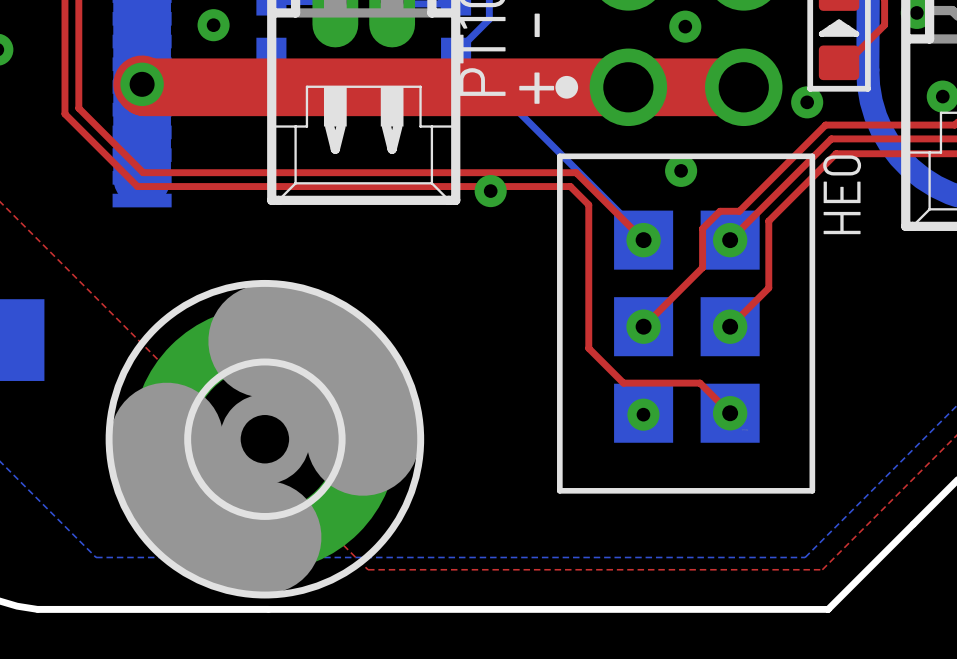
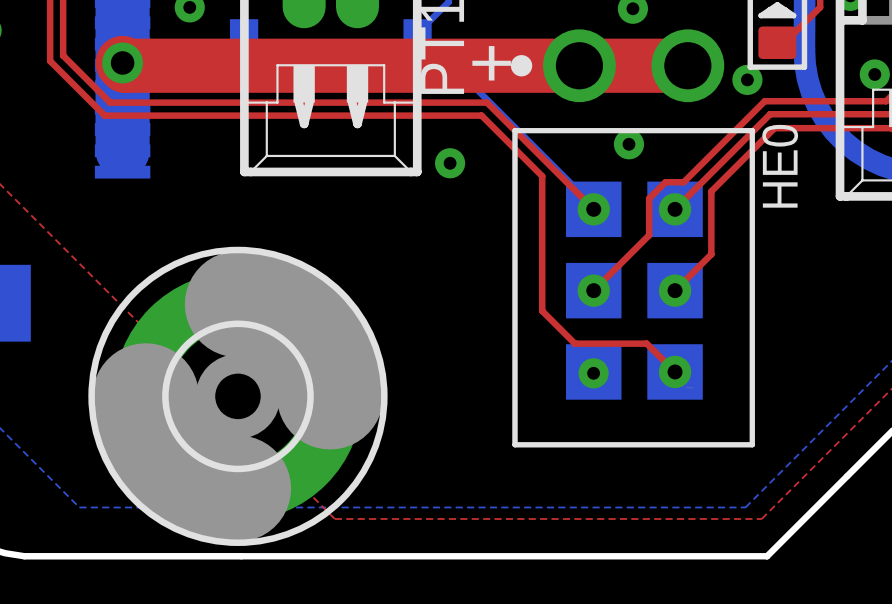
top track: (78, 76) (78, 108) (143, 172) (576, 172) -> (63, 55) (110, 102) (487, 102) (530, 145)
top track: (64, 82) (64, 114) (137, 186) (570, 186) -> (50, 61) (104, 115) (481, 115) (524, 158)

